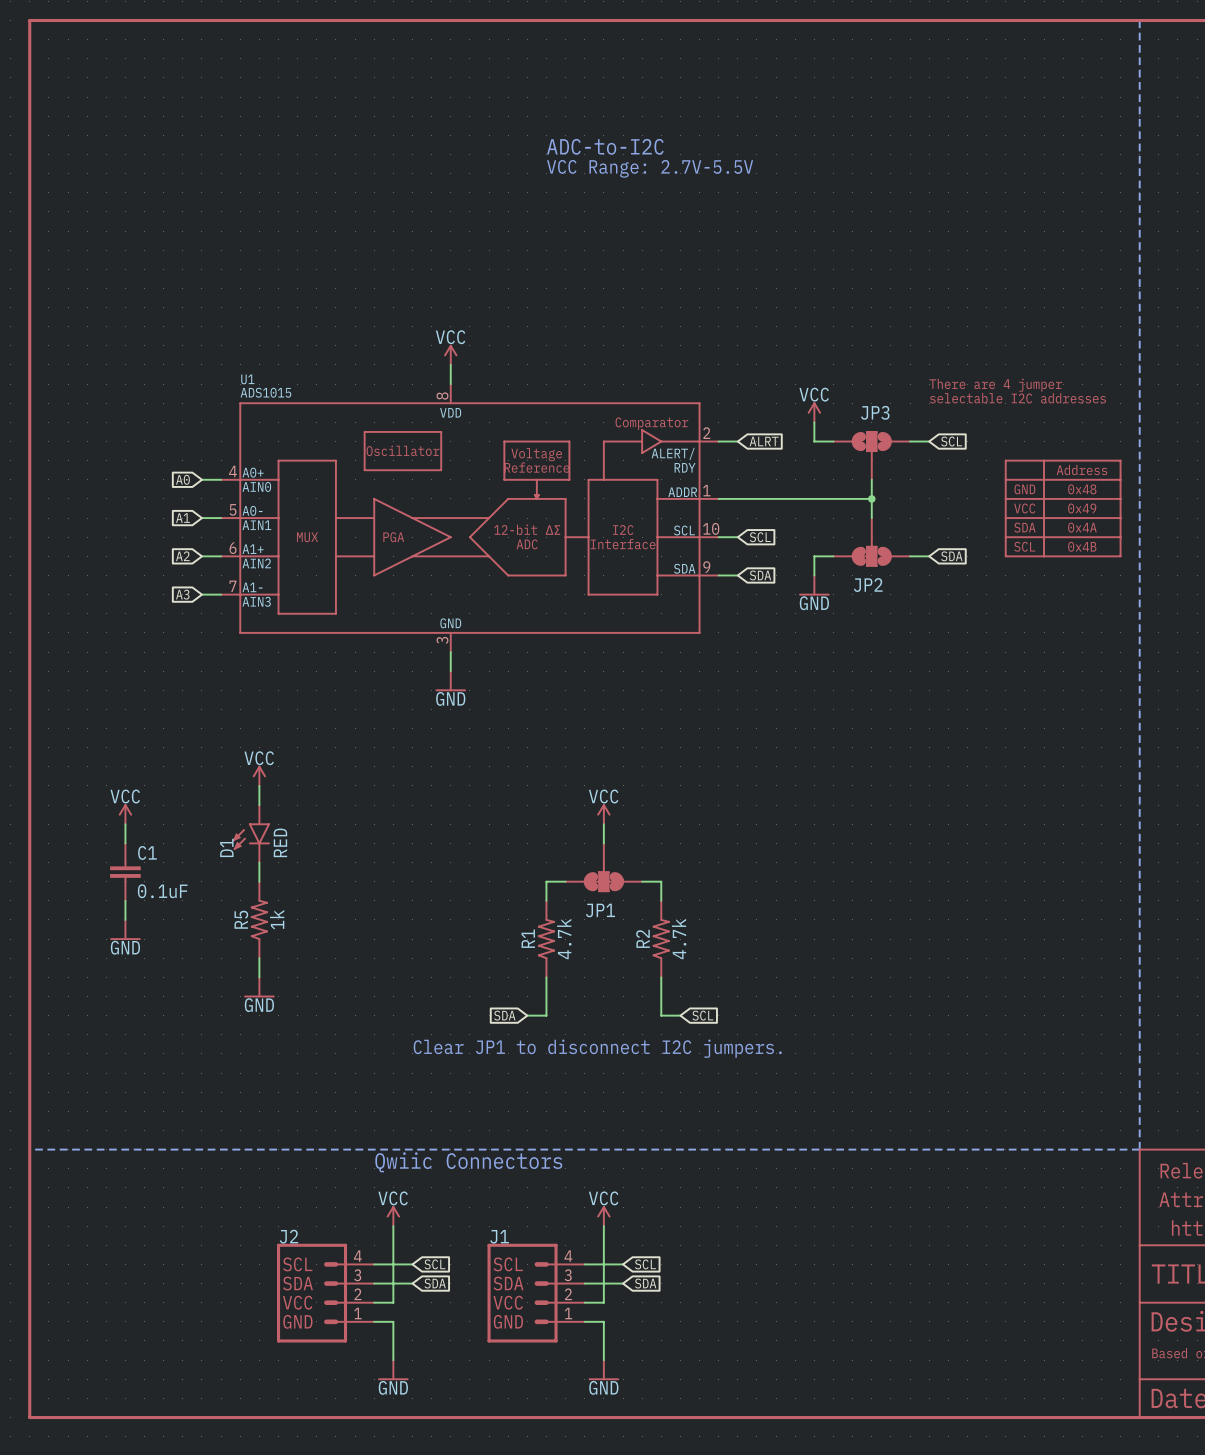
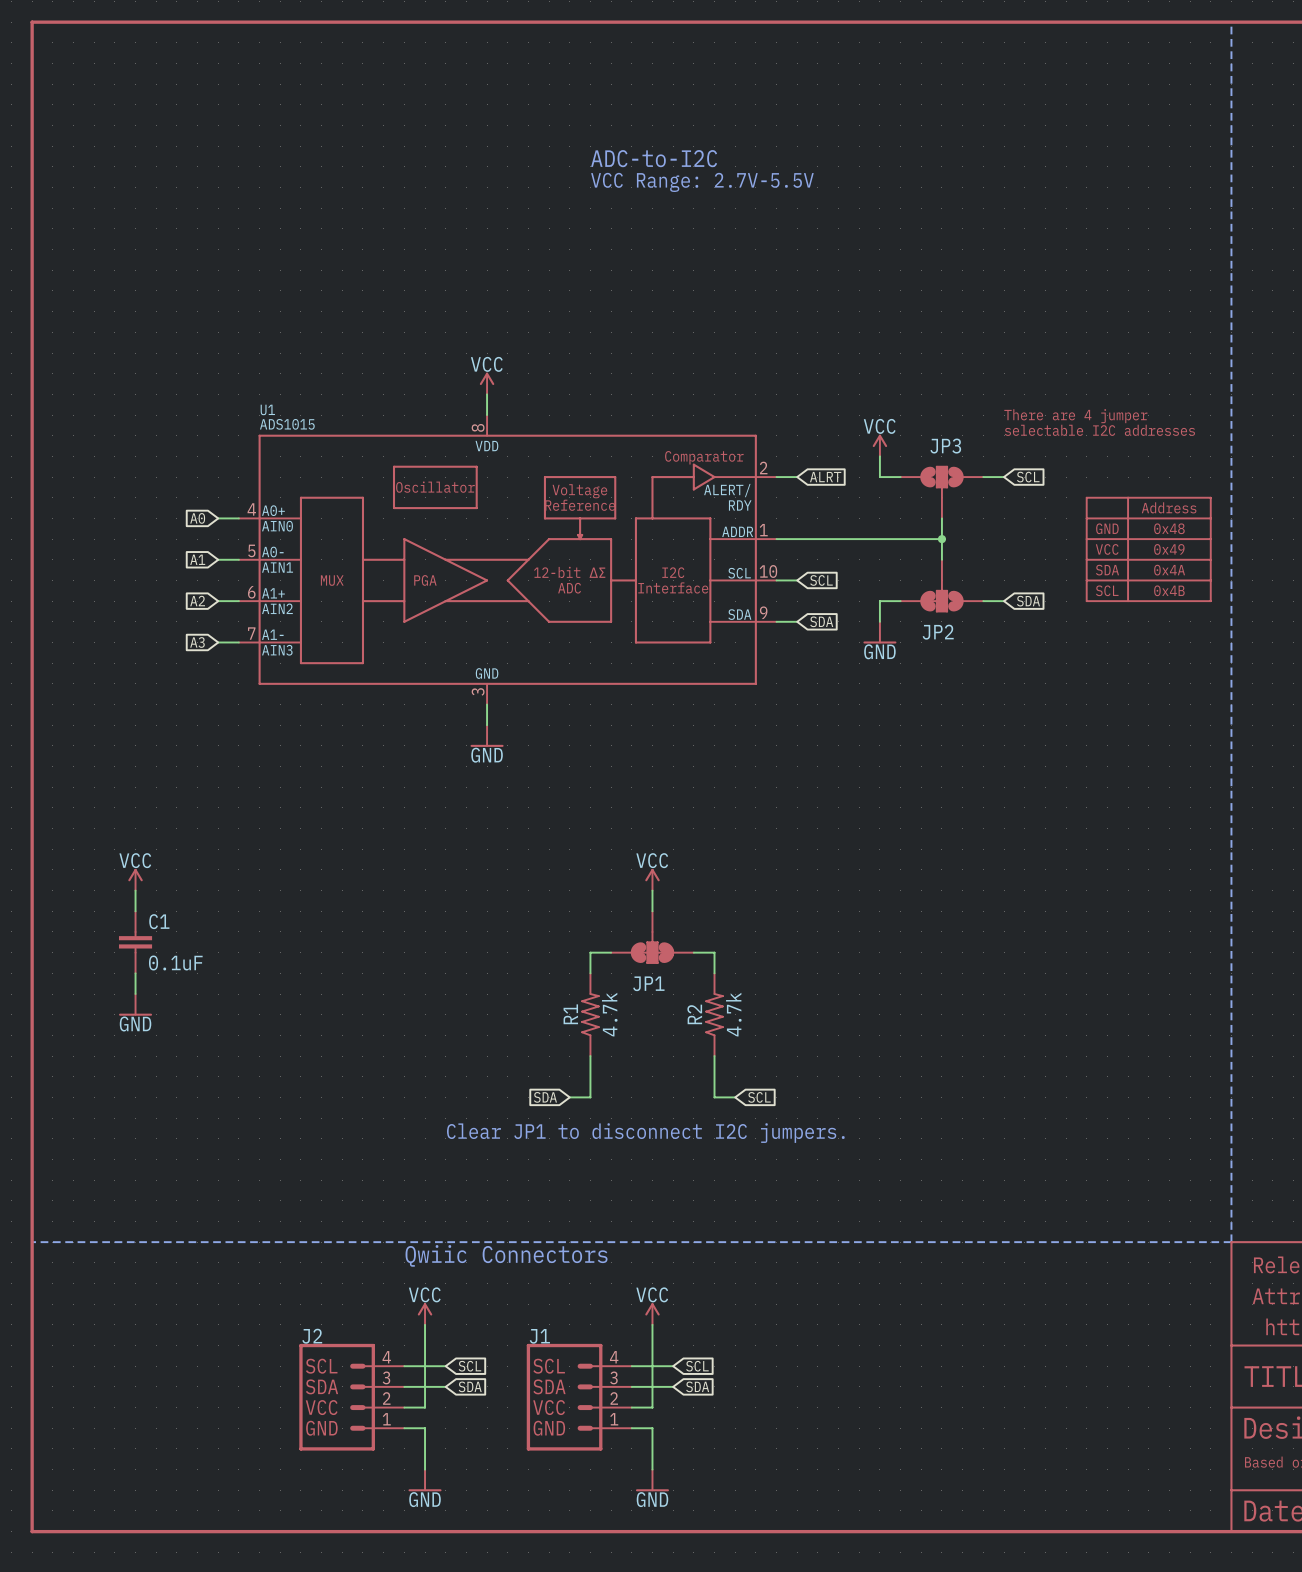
power symbol: VCC (259, 775) -> none
wire: (259, 785) (259, 805) -> none
D1: RED (251, 833) -> none
wire: (259, 862) (259, 881) -> none
R5: 1k (259, 919) -> none
wire: (259, 958) (259, 977) -> none
power symbol: GND (259, 987) -> none

